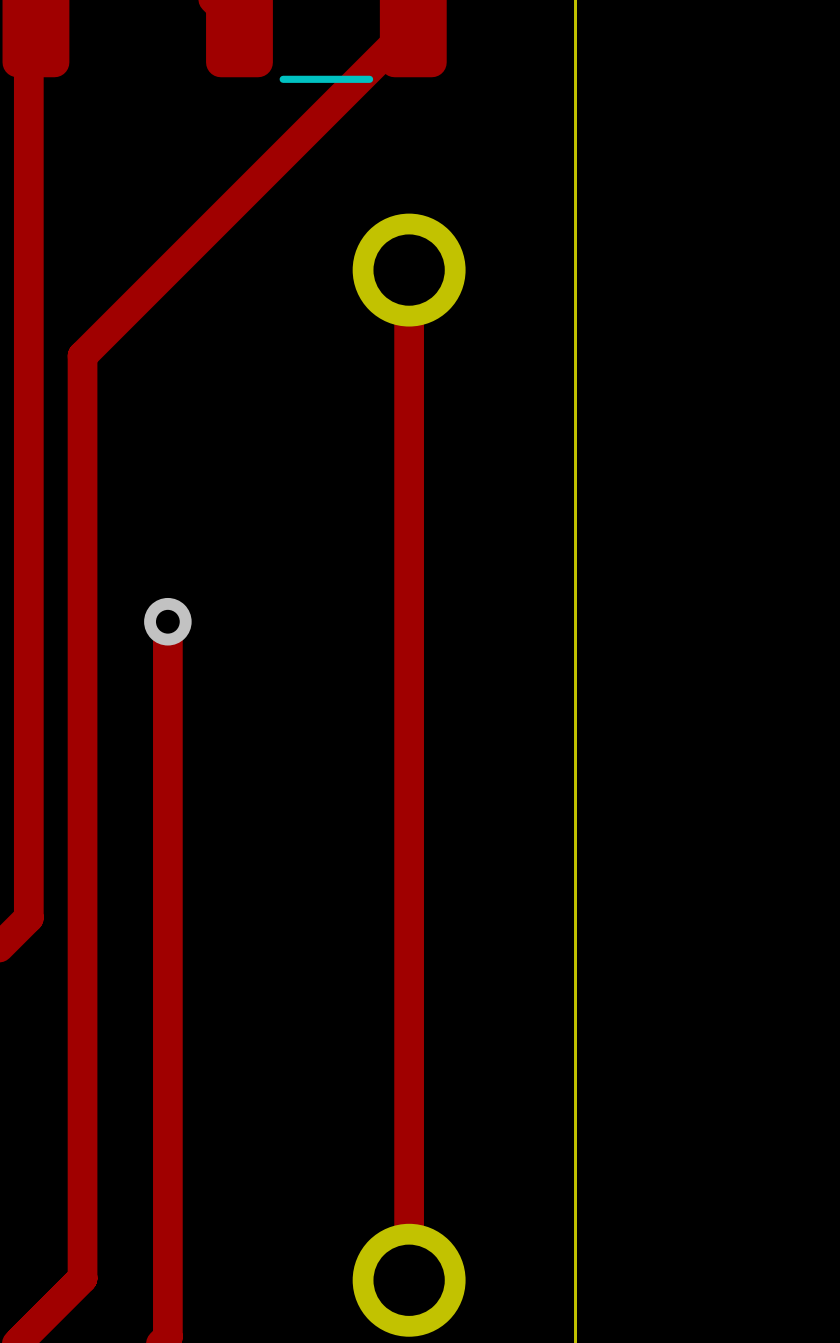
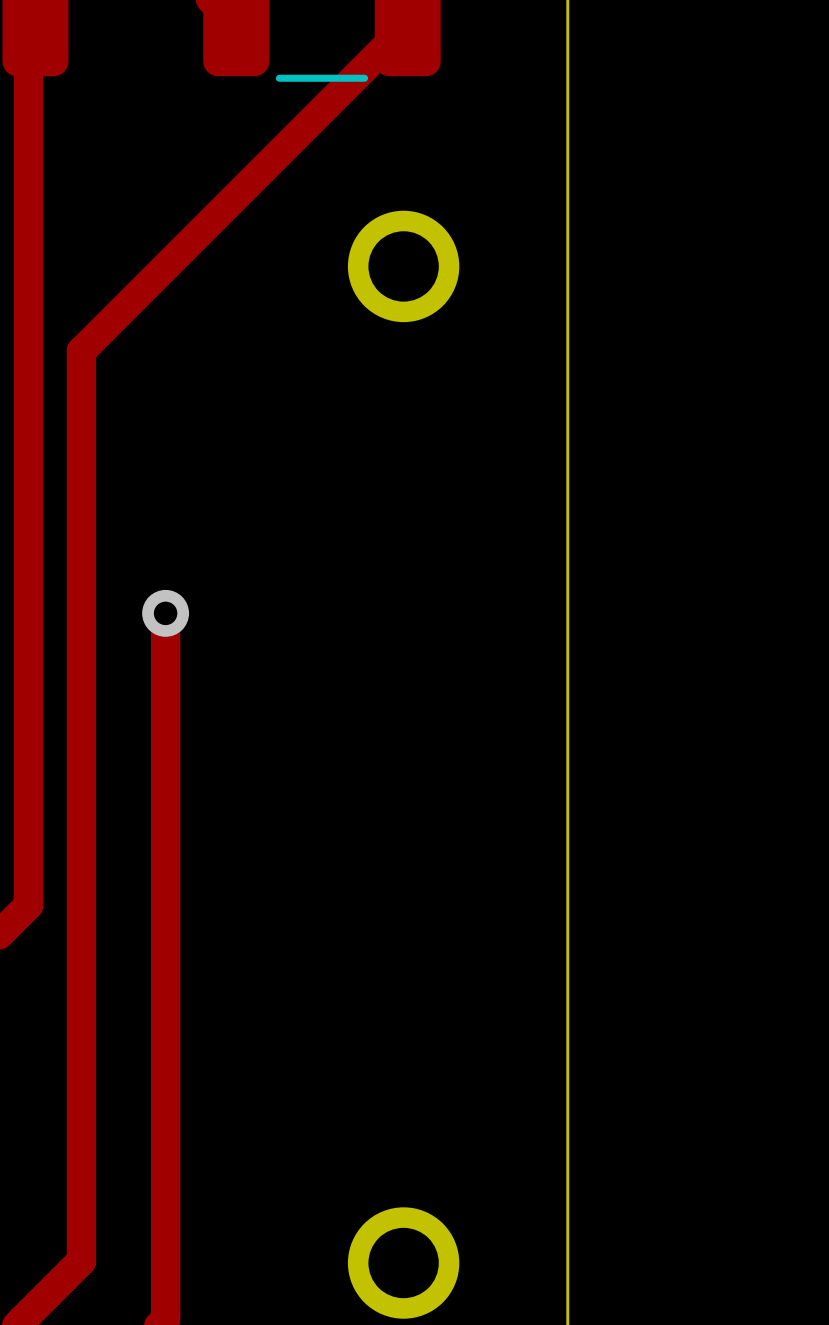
track: (409, 270) (409, 1280) -> none

